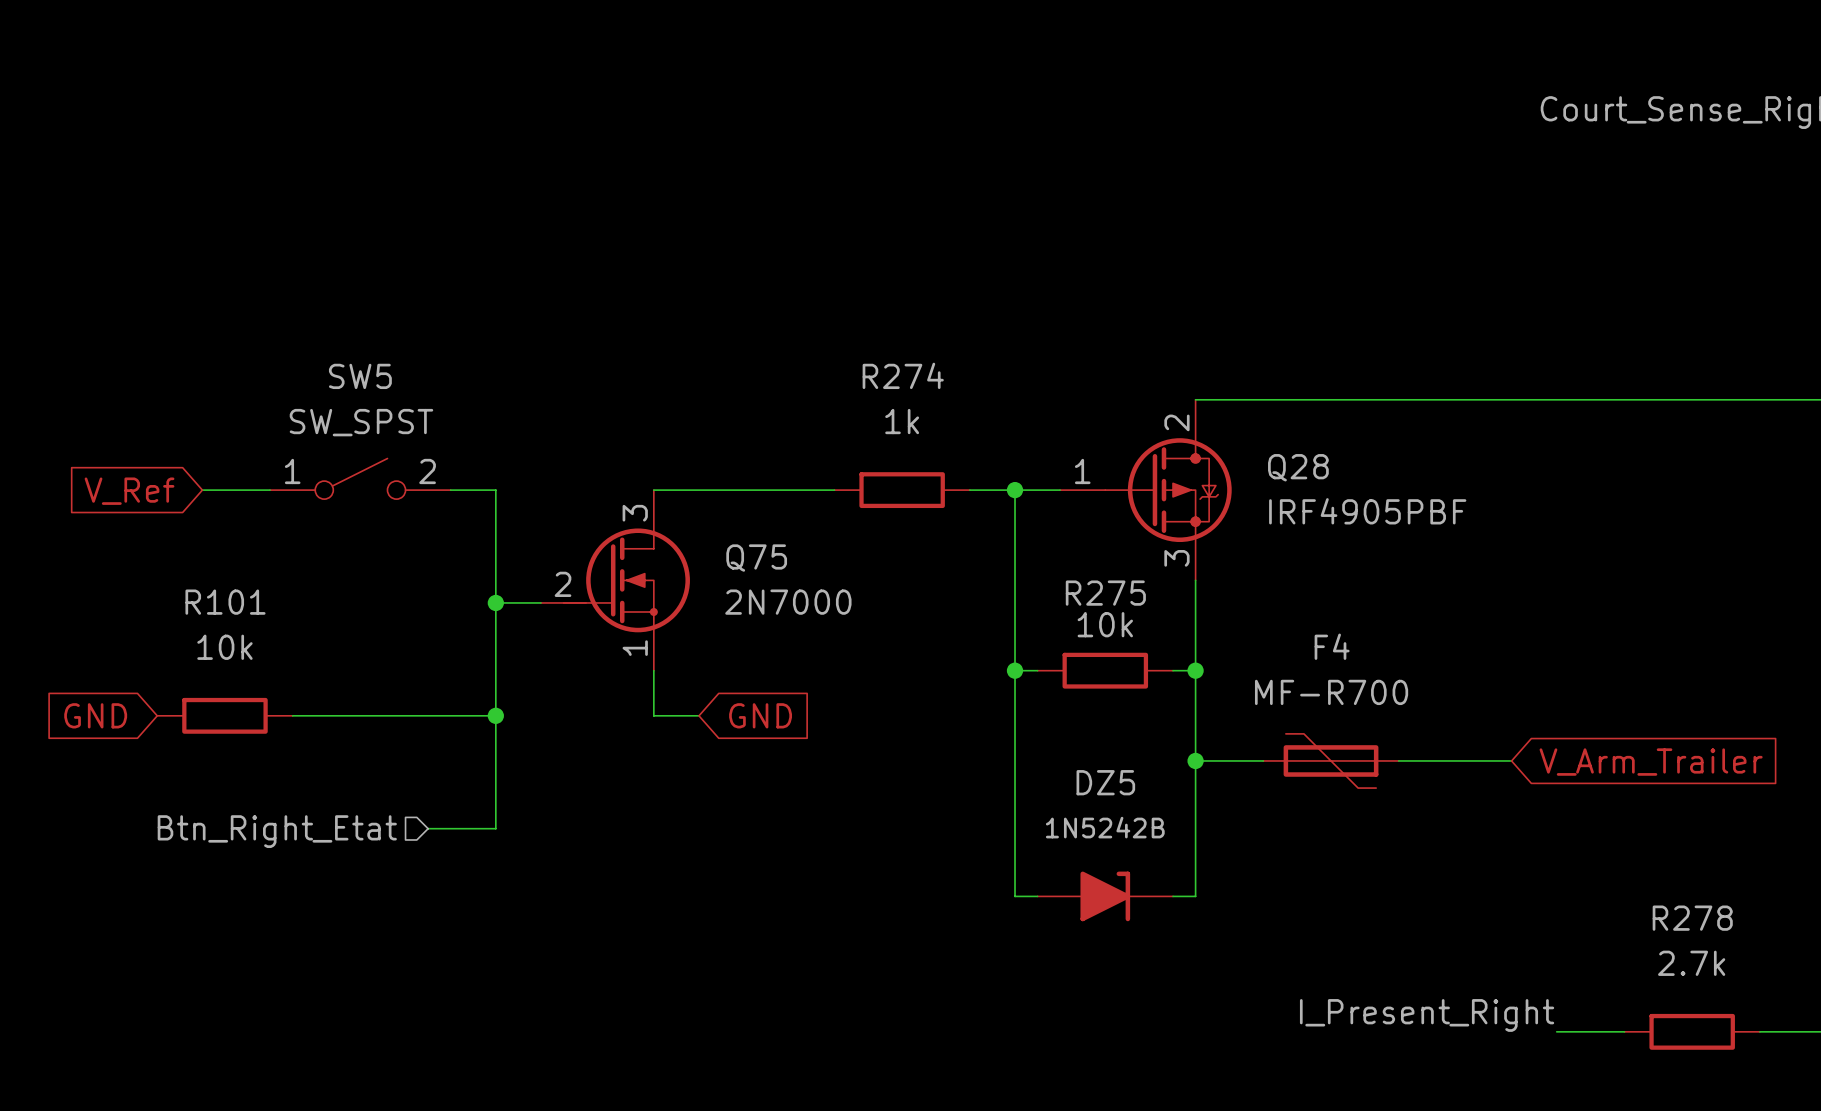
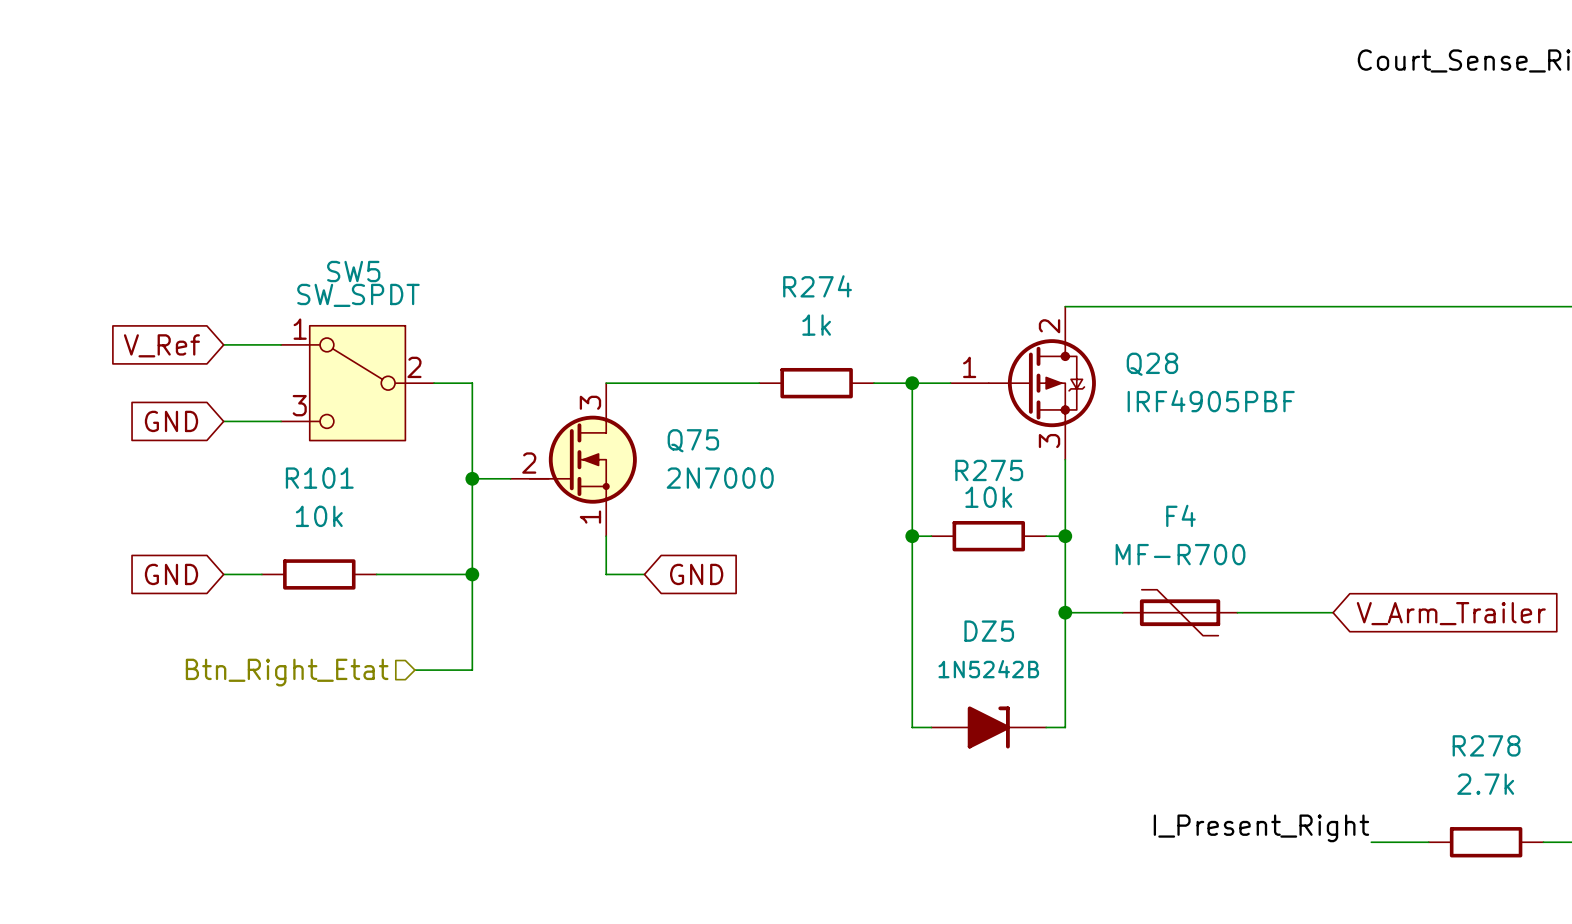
SW5 value: SW_SPST (361, 422) -> SW_SPDT (358, 295)
SW5 symbol: [270, 458, 451, 500] -> [281, 325, 435, 441]
wire: (202, 490) (270, 490) -> (223, 344) (281, 344)
global label position: V_Ref (129, 491) -> V_Ref (161, 345)
global label: none -> GND (171, 421)
wire: none -> (223, 421) (281, 421)
global label position: GND (95, 715) -> GND (171, 574)
wire: none -> (223, 574) (261, 574)
R101 position: (224, 715) -> (319, 574)
wire: (292, 715) (382, 715) -> none

